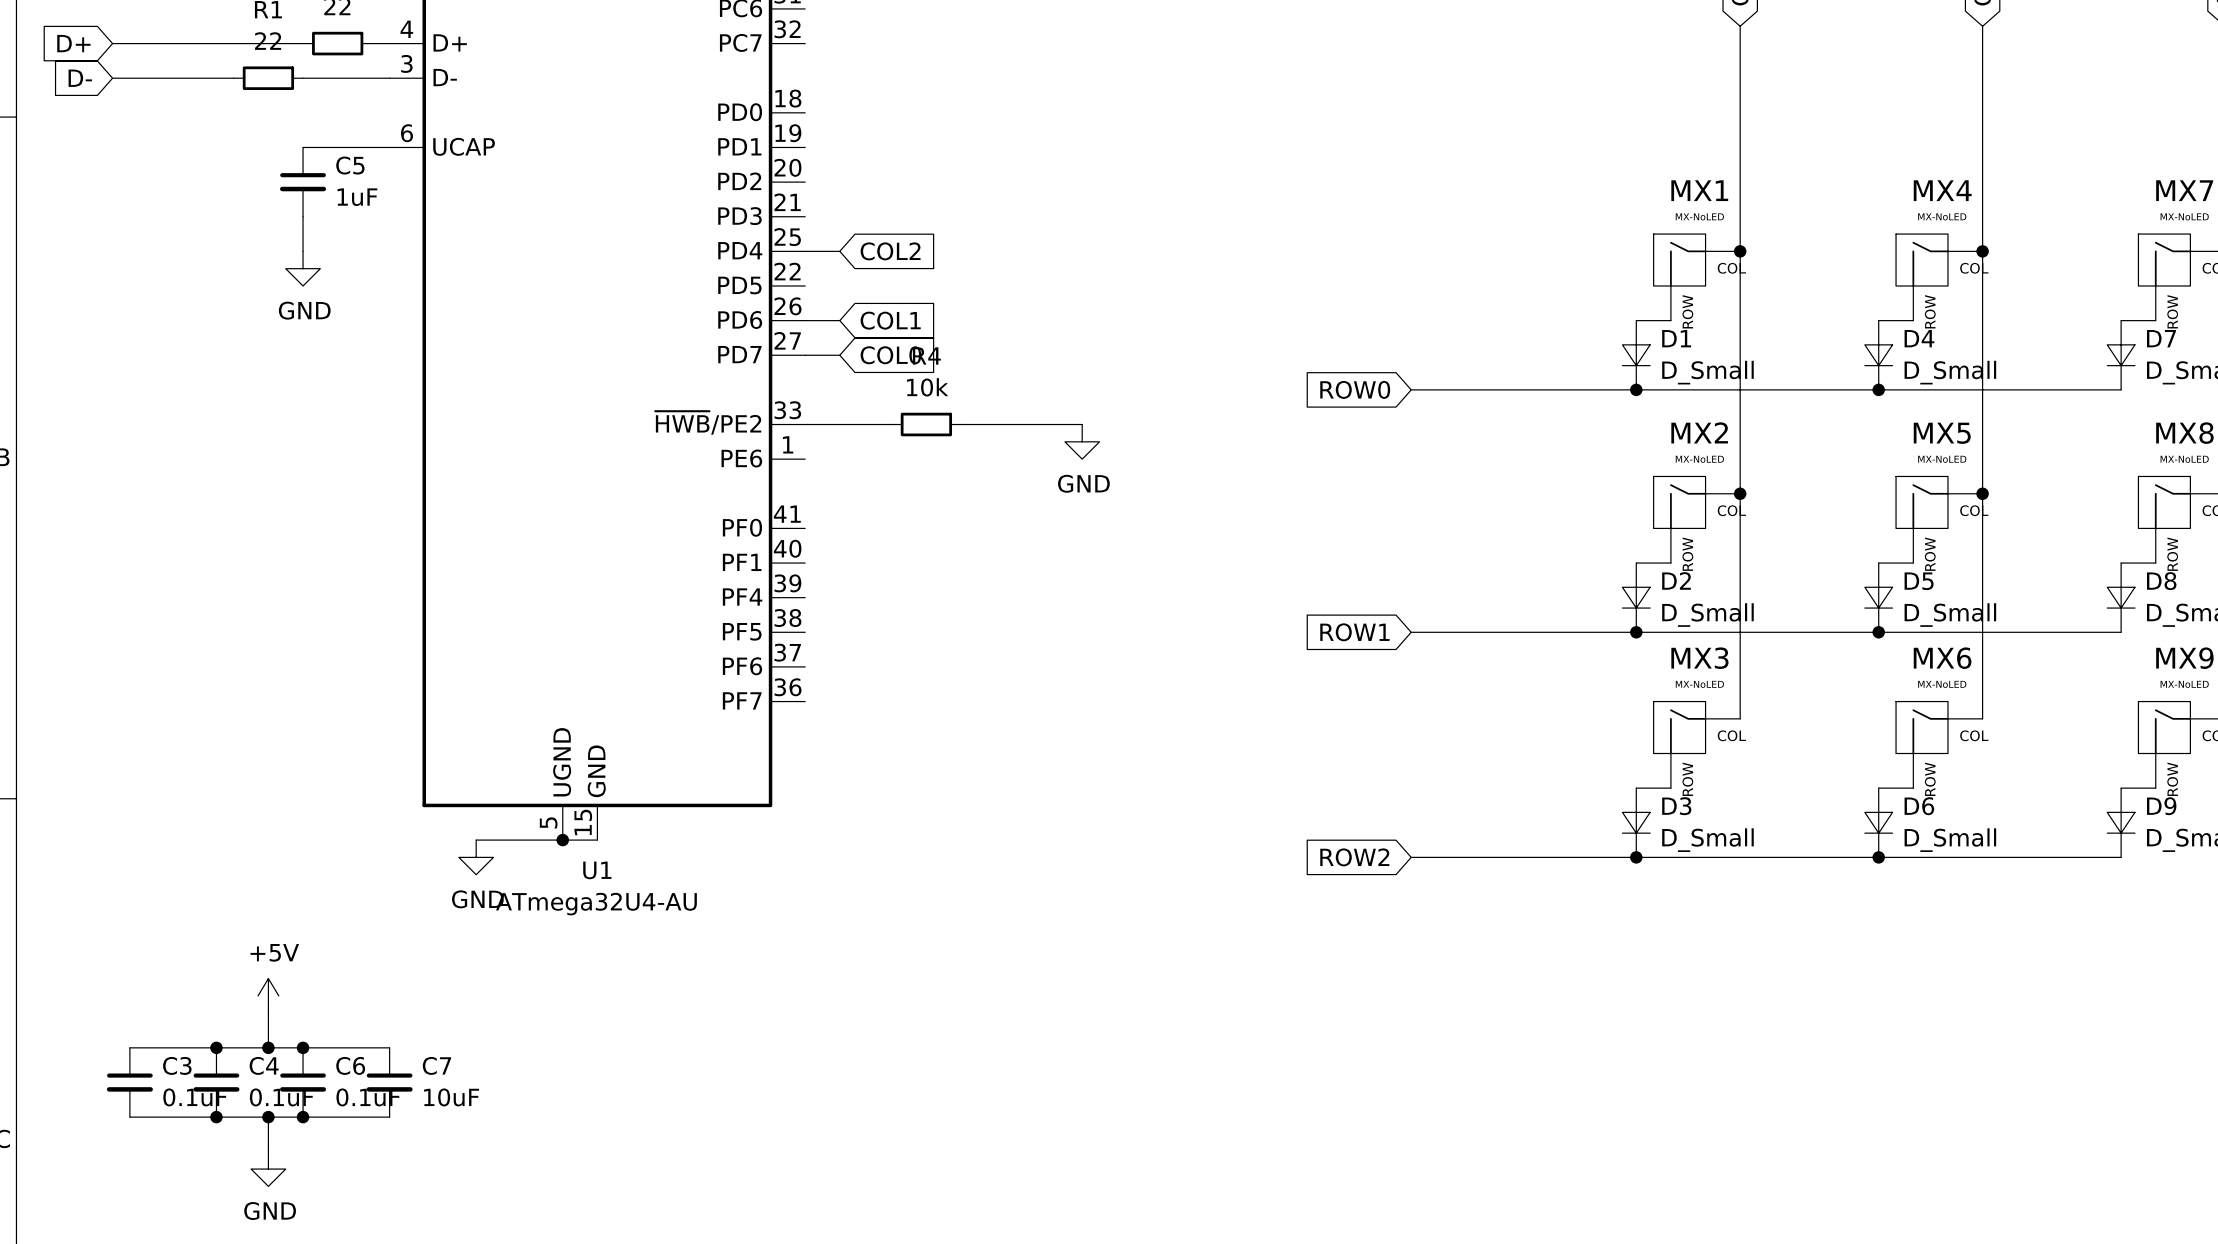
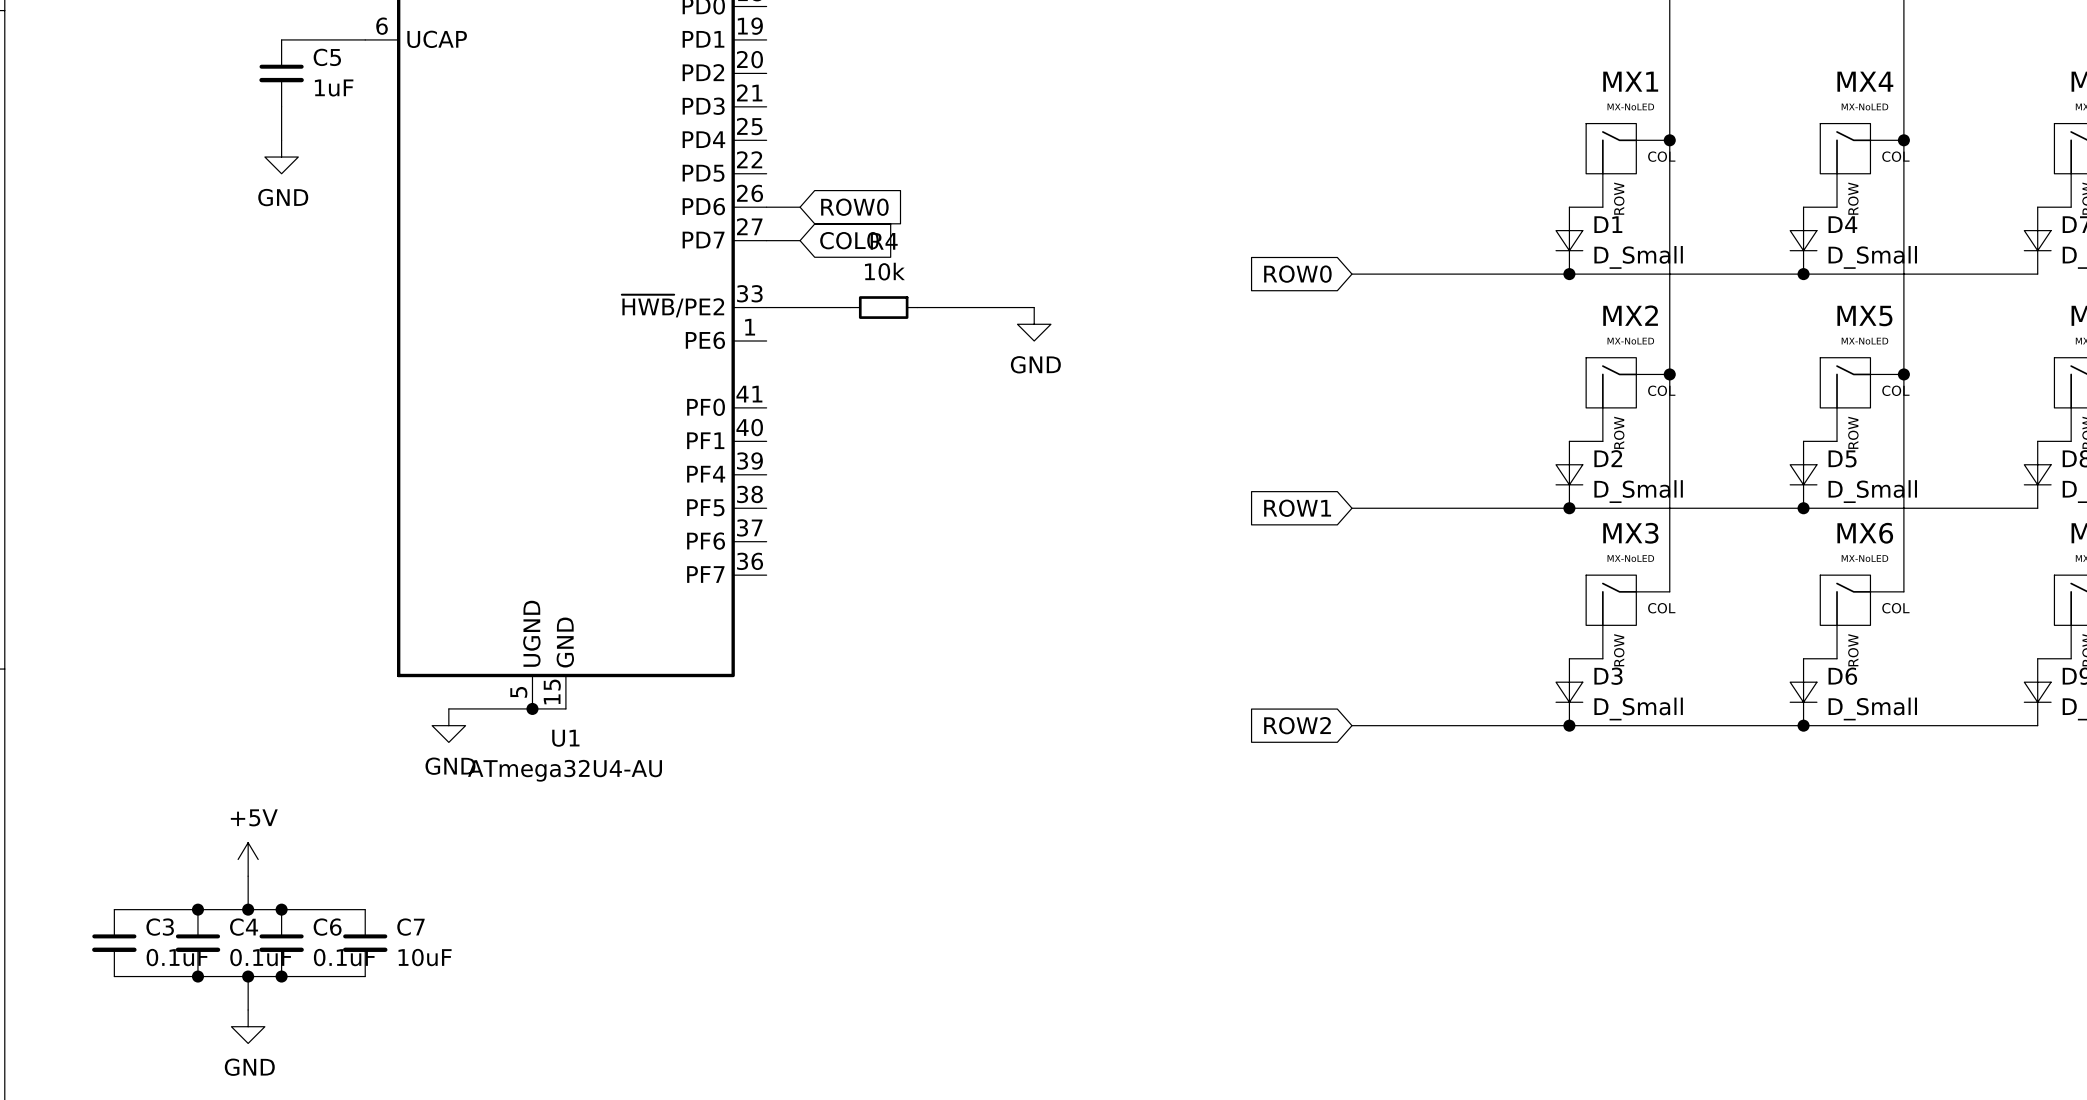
wire: (805, 251) (839, 251) -> none
global label: COL2 (890, 251) -> none
global label: COL1 (890, 320) -> ROW0 (854, 207)

